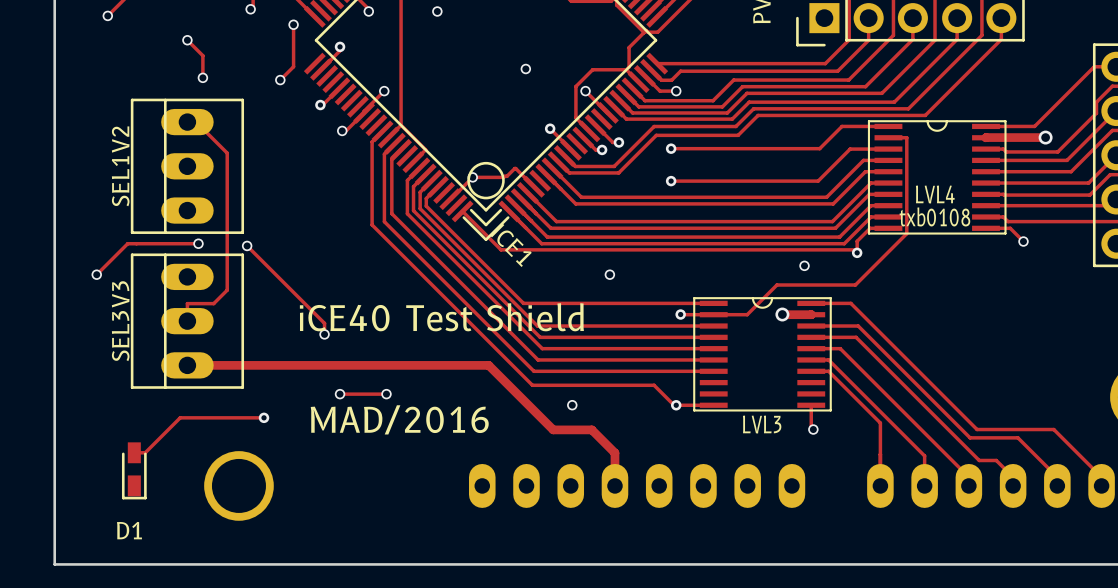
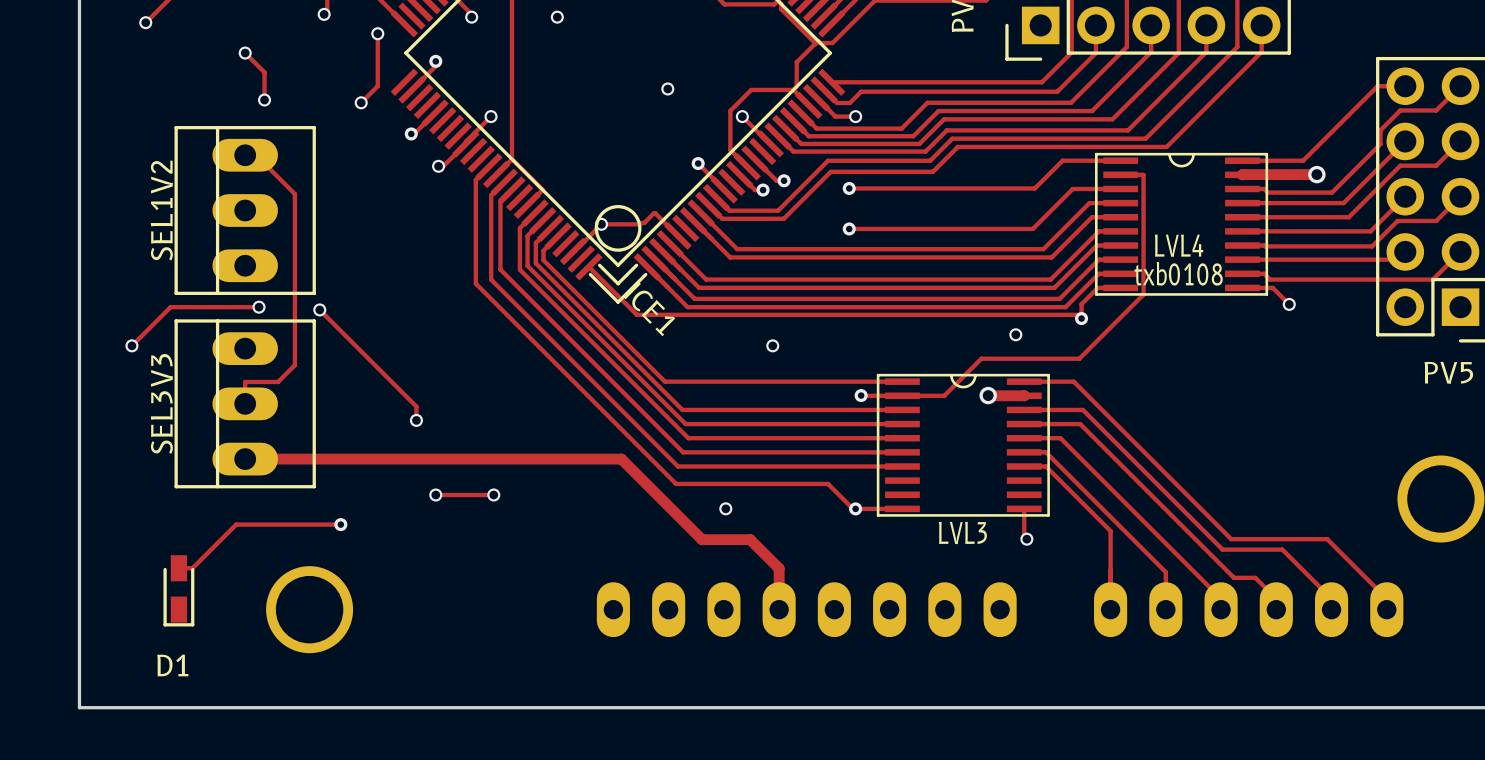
text: iCE40 Test Shield (441, 317) -> none
text: MAD/2016 (399, 419) -> none

